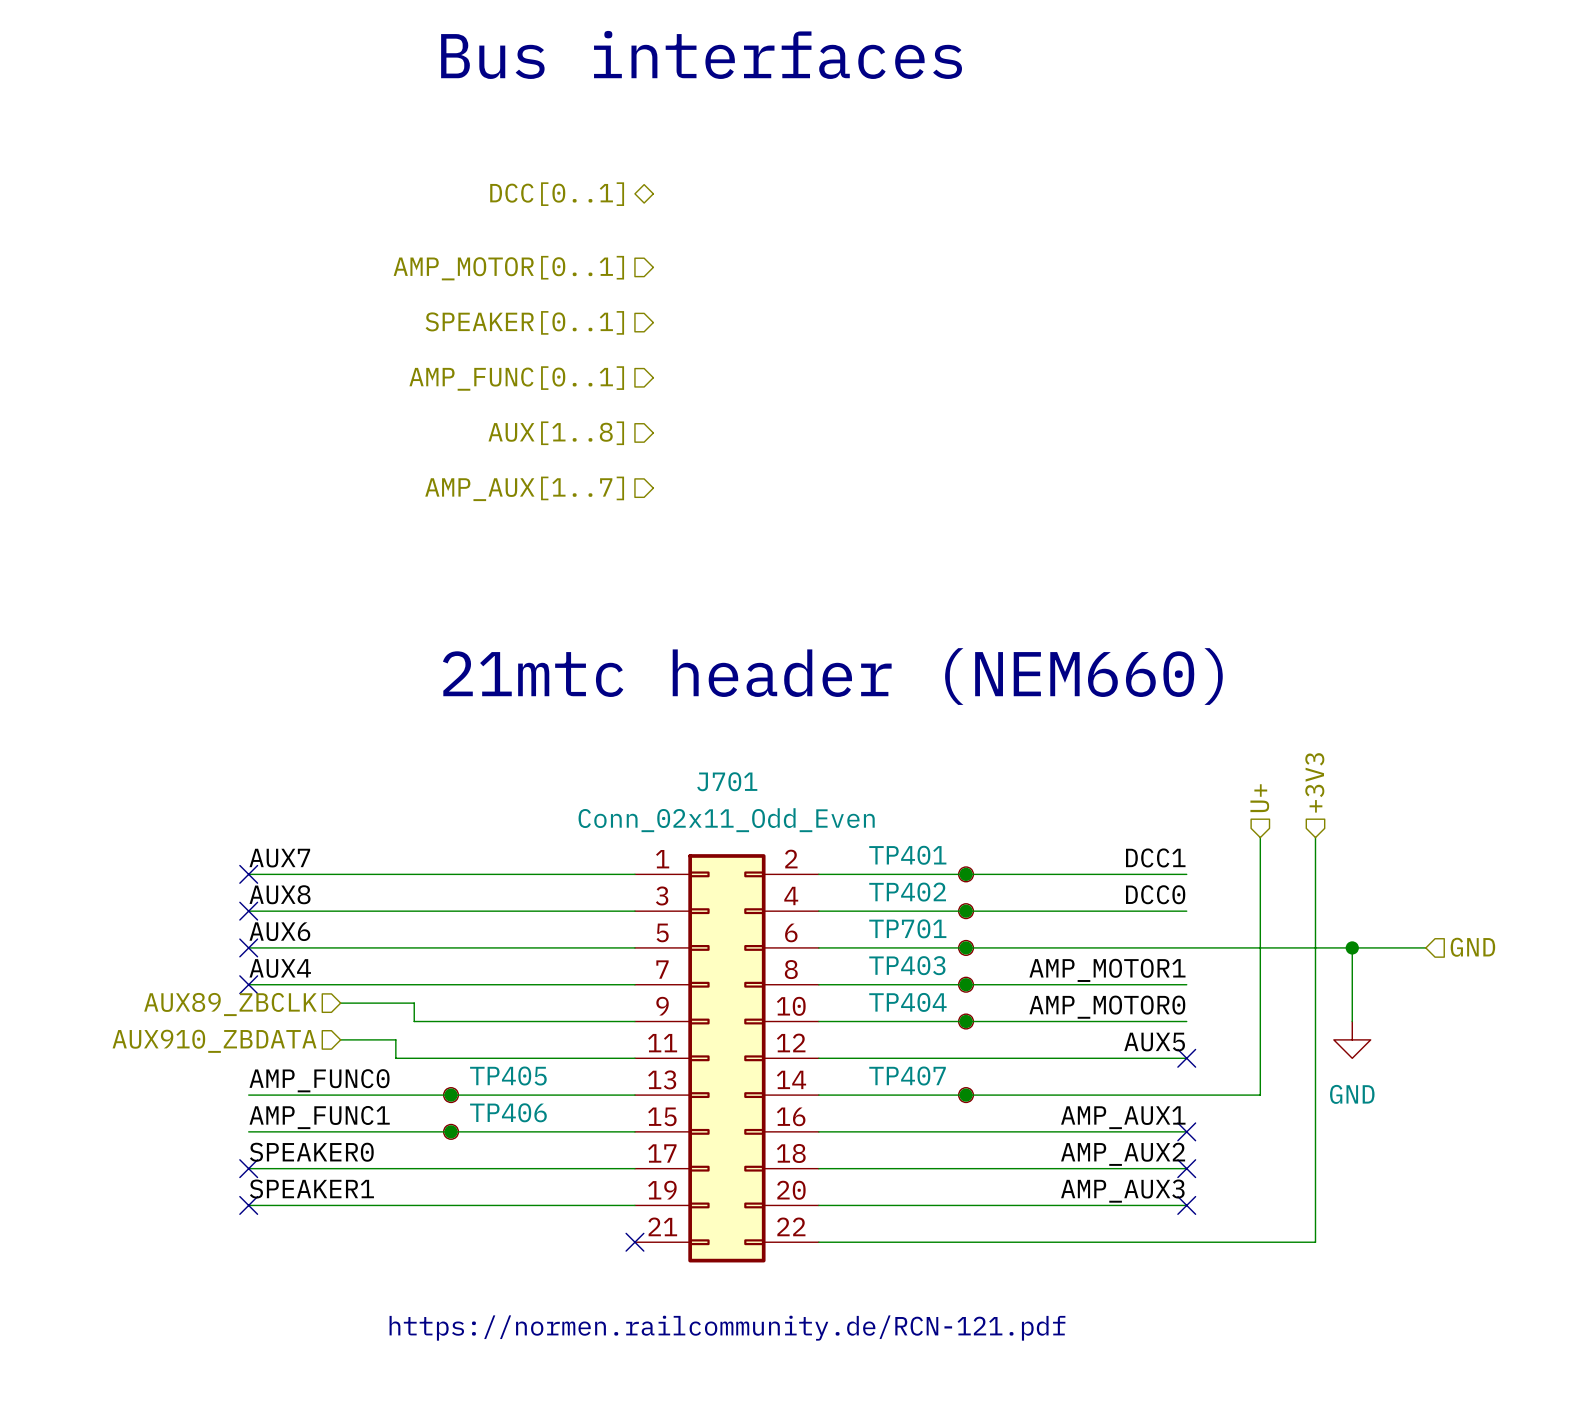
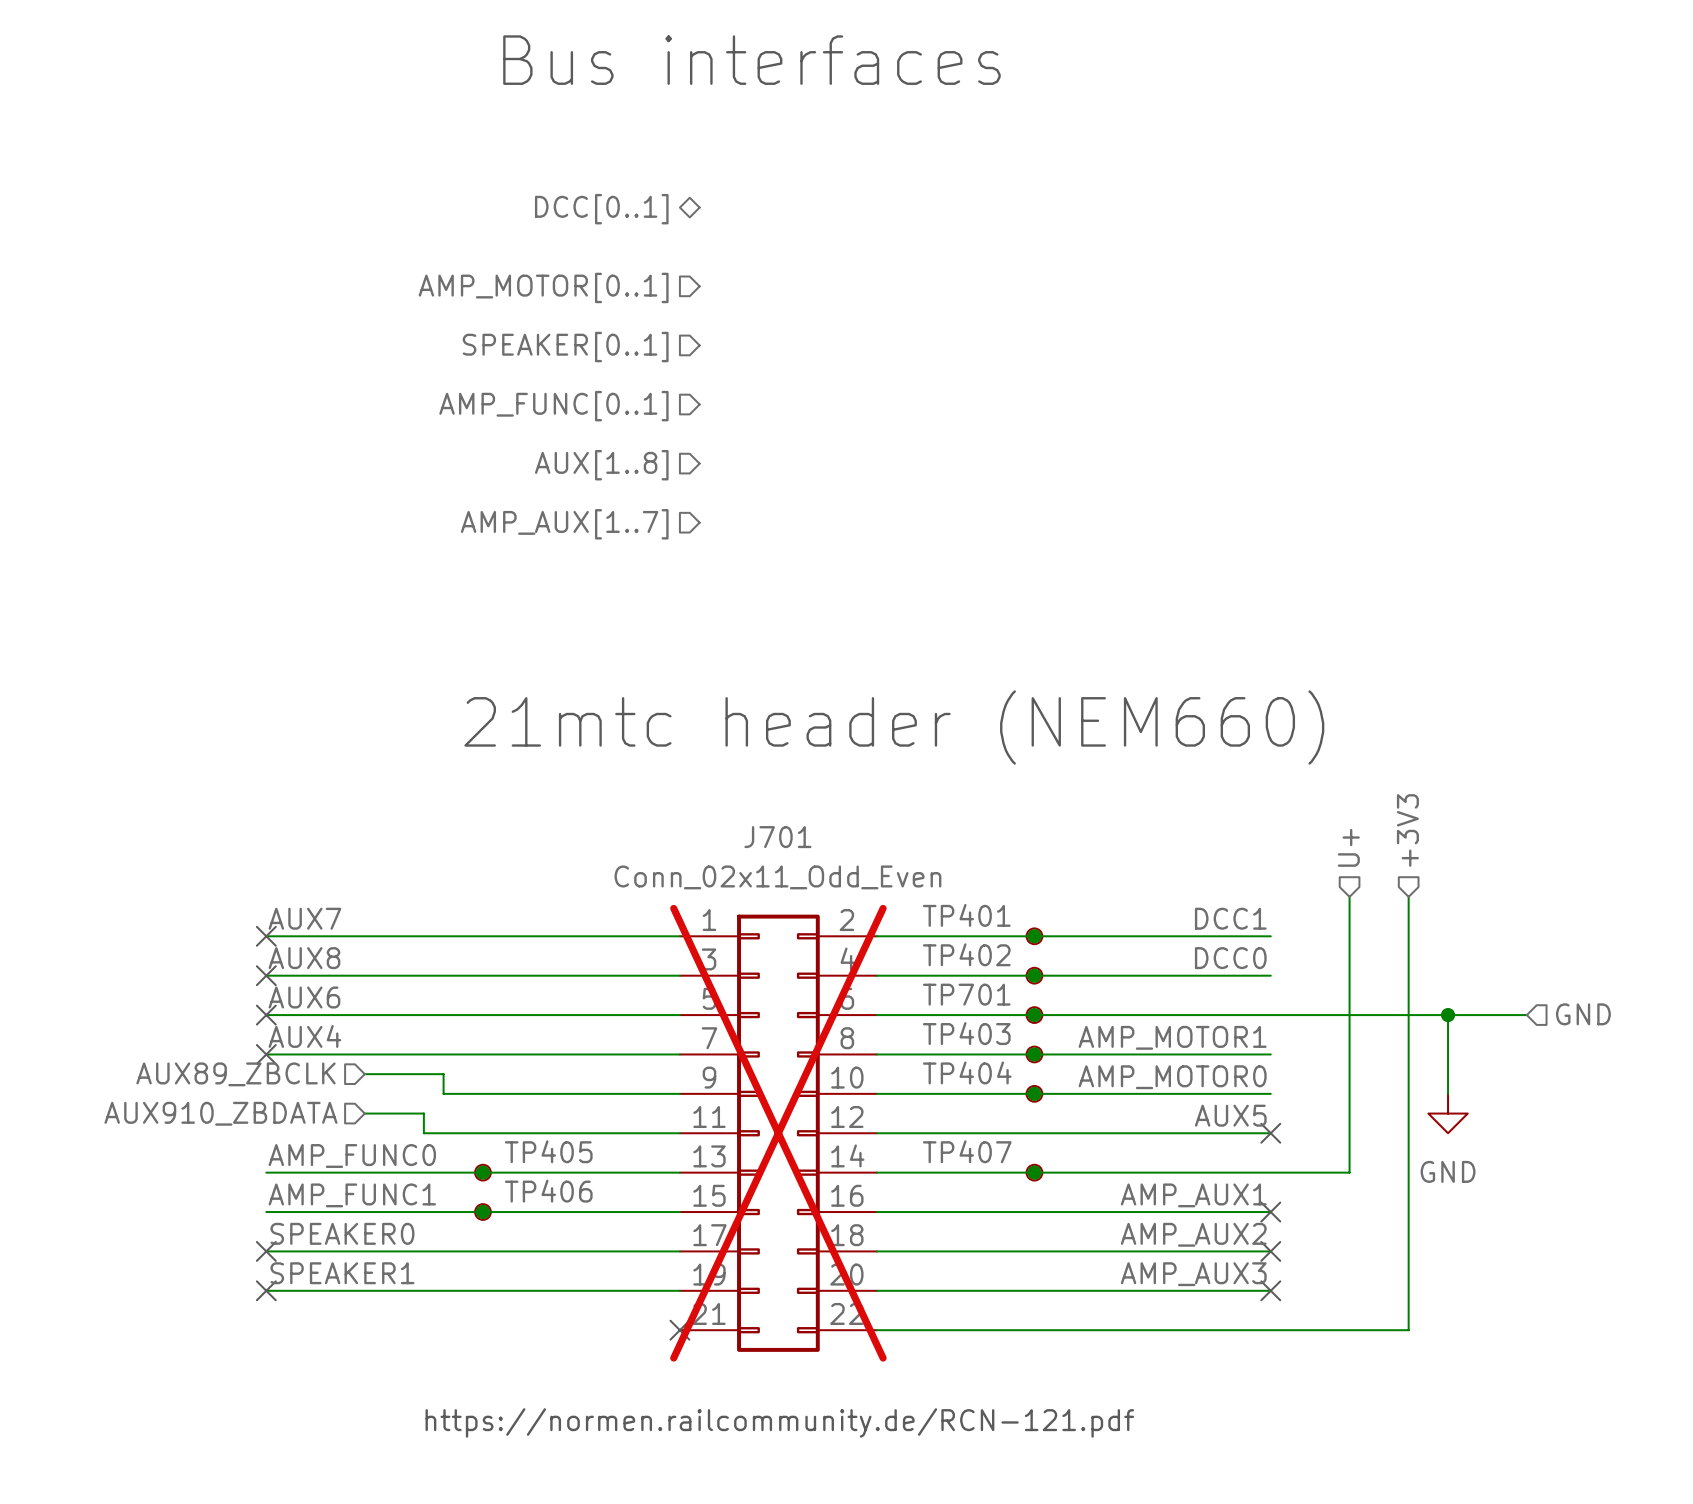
J701 do-not-place cross: none -> (778, 1133)

